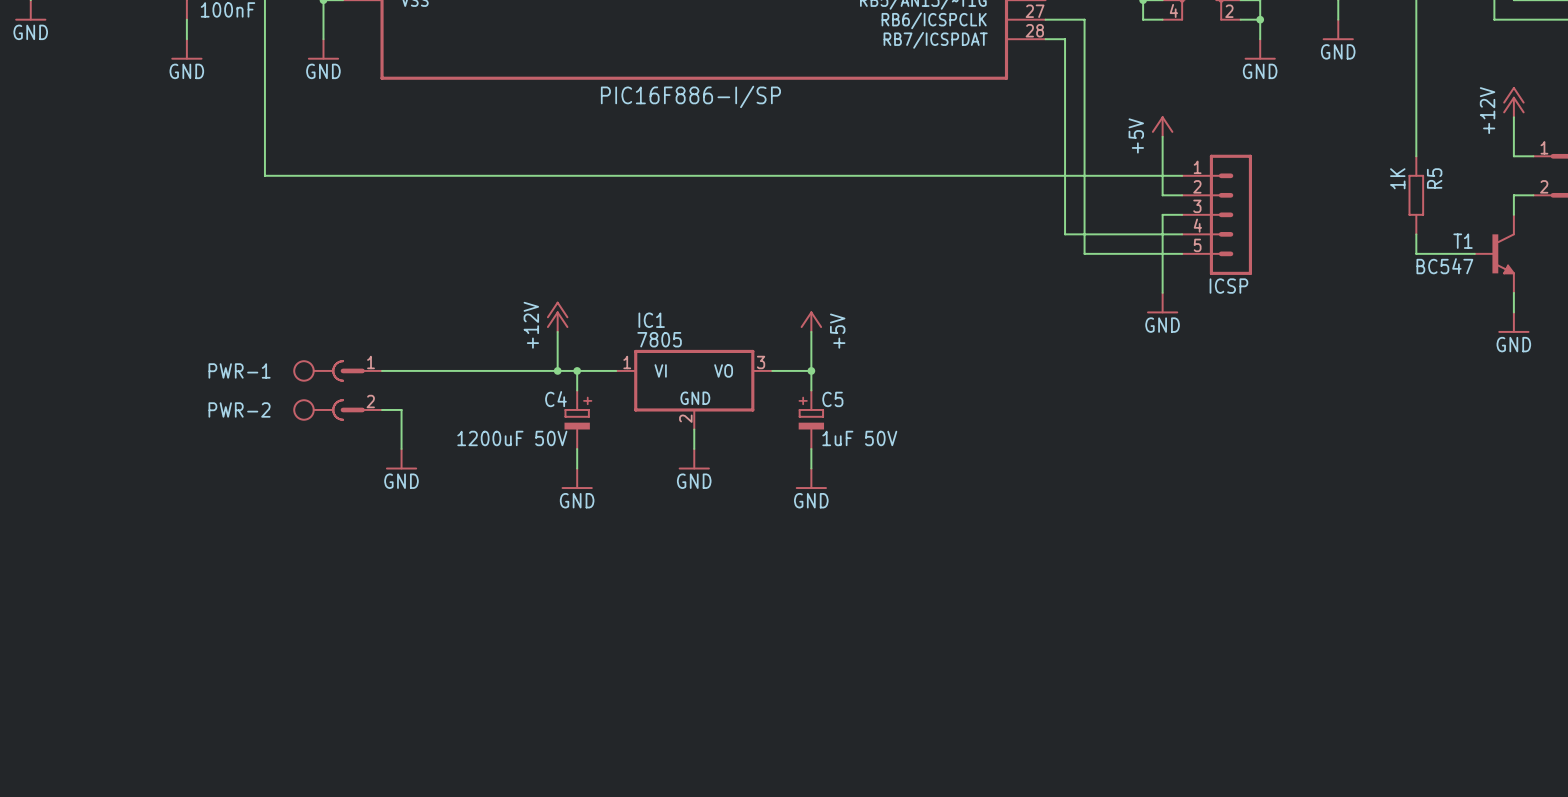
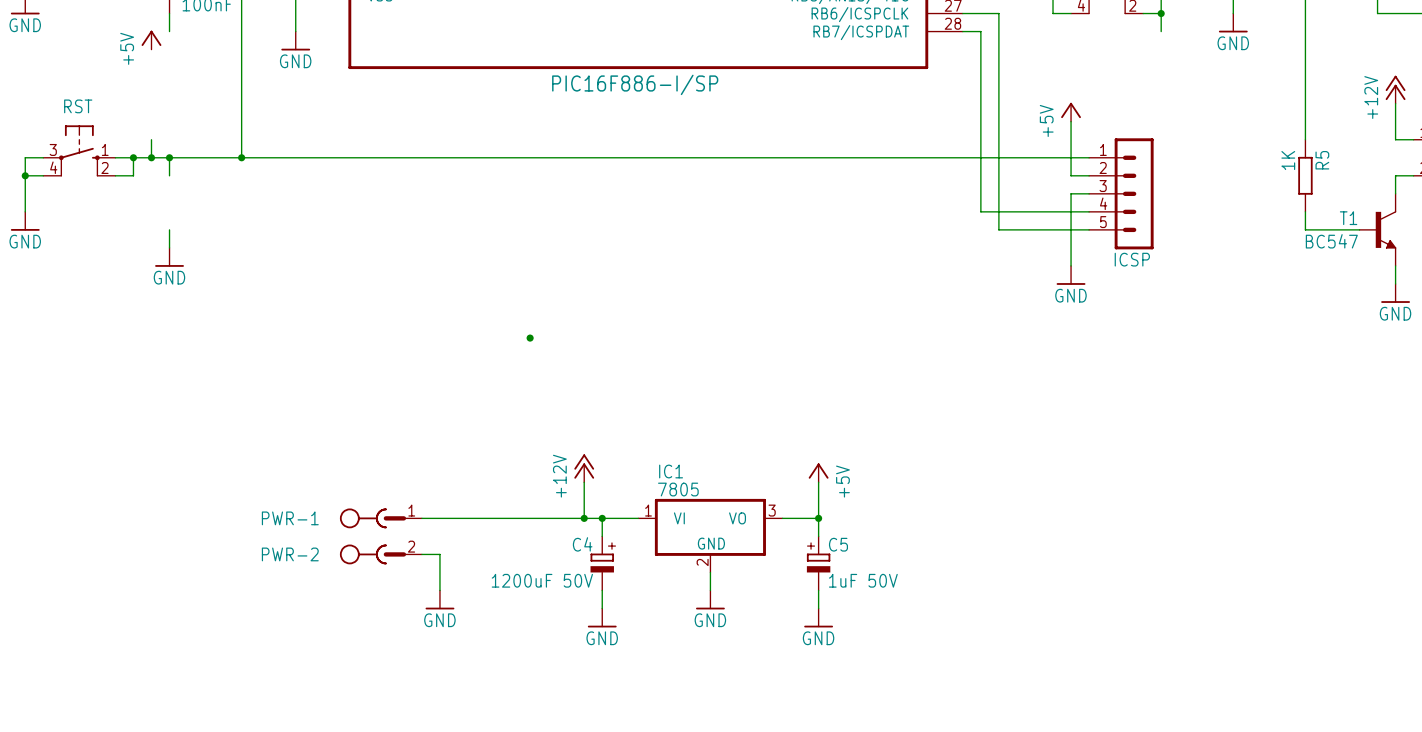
power symbol: none -> +5V (151, 40)
power symbol: GND (186, 49) -> none
power symbol: GND (1260, 49) -> none
wire: none -> (151, 139) (151, 157)
RST: none -> (79, 150)
wire: none -> (43, 157) (25, 157) (25, 211)
wire: none -> (115, 157) (241, 157)
wire: none -> (133, 157) (133, 175) (115, 175)
junction: none -> (133, 157)
junction: none -> (151, 157)
wire: none -> (169, 157) (169, 175)
junction: none -> (169, 157)
junction: none -> (241, 157)
wire: none -> (25, 175) (43, 175)
junction: none -> (25, 175)
power symbol: none -> GND (25, 221)
wire: none -> (169, 229) (169, 247)
power symbol: none -> GND (169, 257)
power symbol: +12V (557, 316) -> none
power symbol: +5V (811, 321) -> none
wire: (557, 331) (557, 370) -> none
wire: (811, 331) (811, 390) -> none
PWR-1 position: (337, 370) -> (380, 518)
wire: (382, 370) (616, 370) -> none
junction: (557, 370) -> none
wire: (577, 370) (577, 390) -> none
wire: (772, 370) (811, 370) -> none
junction: (811, 370) -> none
IC1 position: (694, 389) -> (710, 535)
PWR-2 position: (337, 409) -> (380, 554)
wire: (382, 409) (401, 409) (401, 449) -> none
C4 position: (577, 419) -> (602, 563)
C5 position: (811, 419) -> (818, 563)
wire: (694, 429) (694, 449) -> none
wire: (577, 449) (577, 468) -> (602, 518) (602, 536)
wire: (811, 449) (811, 468) -> (710, 572) (710, 590)
power symbol: GND (401, 459) -> none
power symbol: GND (694, 459) -> none
power symbol: GND (577, 478) -> none
power symbol: GND (811, 478) -> none
power symbol: none -> +12V (584, 468)
power symbol: none -> +5V (818, 472)
wire: none -> (584, 482) (584, 518)
wire: none -> (818, 482) (818, 536)
wire: none -> (421, 518) (638, 518)
junction: none -> (584, 518)
junction: none -> (602, 518)
wire: none -> (782, 518) (818, 518)
junction: none -> (818, 518)
wire: none -> (421, 554) (439, 554) (439, 590)
wire: none -> (602, 590) (602, 608)
wire: none -> (818, 590) (818, 608)
power symbol: none -> GND (439, 599)
power symbol: none -> GND (710, 599)
power symbol: none -> GND (602, 618)
power symbol: none -> GND (818, 618)

